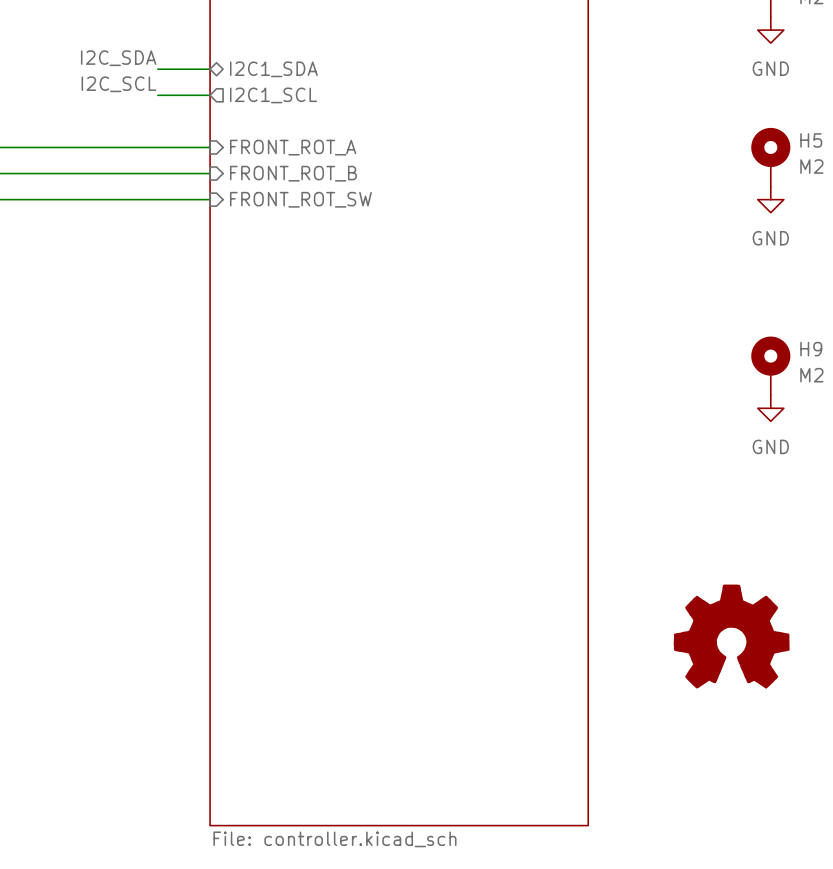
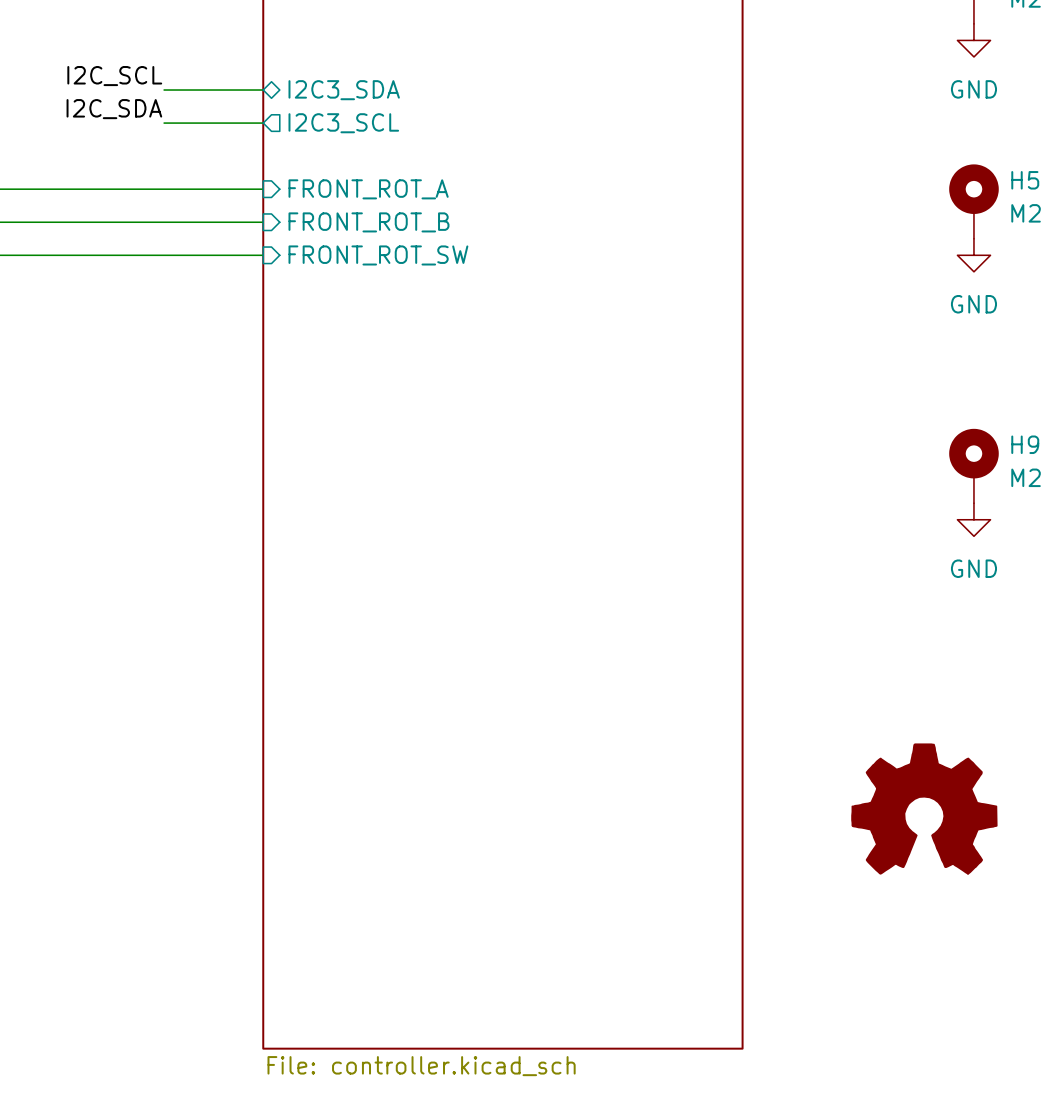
label position: I2C_SDA (118, 58) -> I2C_SDA (114, 109)
wire: none -> (164, 90) (197, 90)
sheet pin: I2C1_SDA (273, 69) -> I2C3_SDA (344, 90)
label position: I2C_SCL (118, 84) -> I2C_SCL (114, 76)
wire: none -> (164, 123) (197, 123)
sheet pin: I2C1_SCL (273, 95) -> I2C3_SCL (343, 123)

